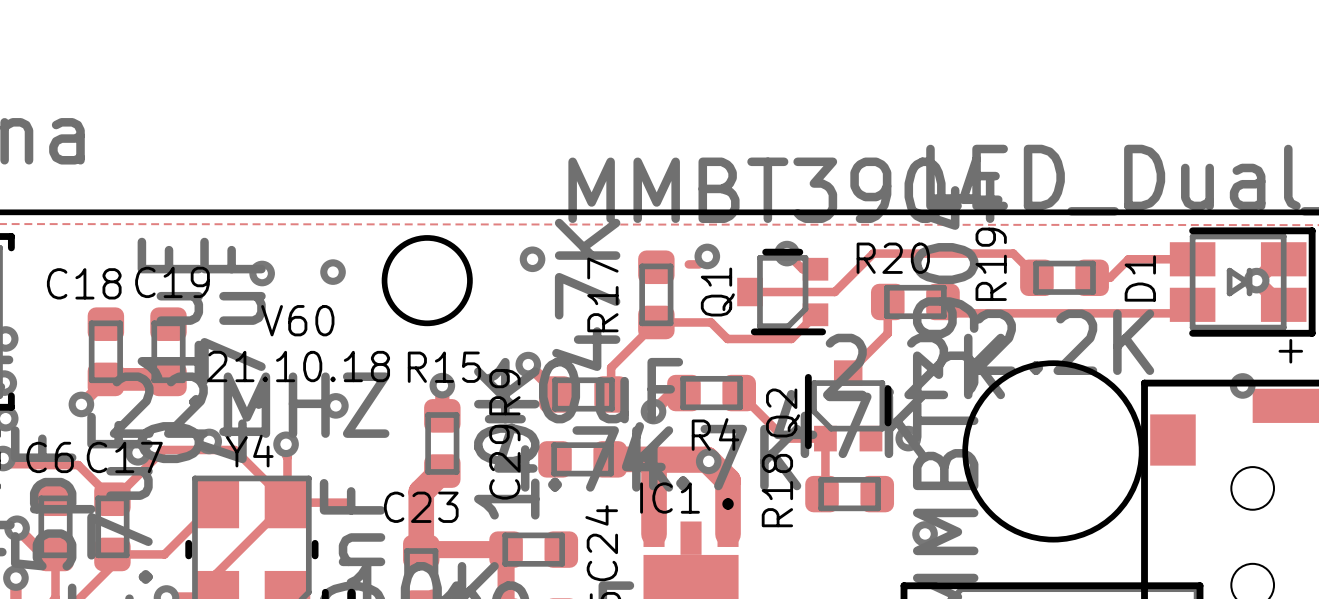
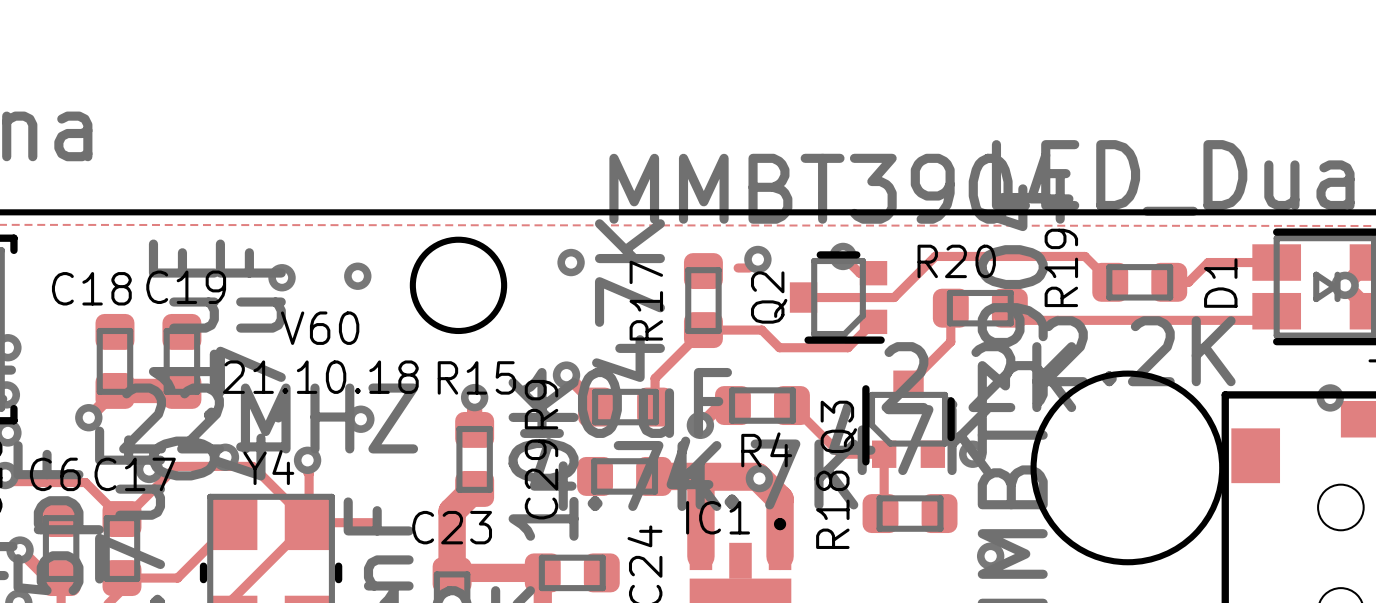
Q1 name: Q1 (717, 292) -> Q2 (769, 297)
Q2 name: Q2 (783, 412) -> Q3 (838, 426)

